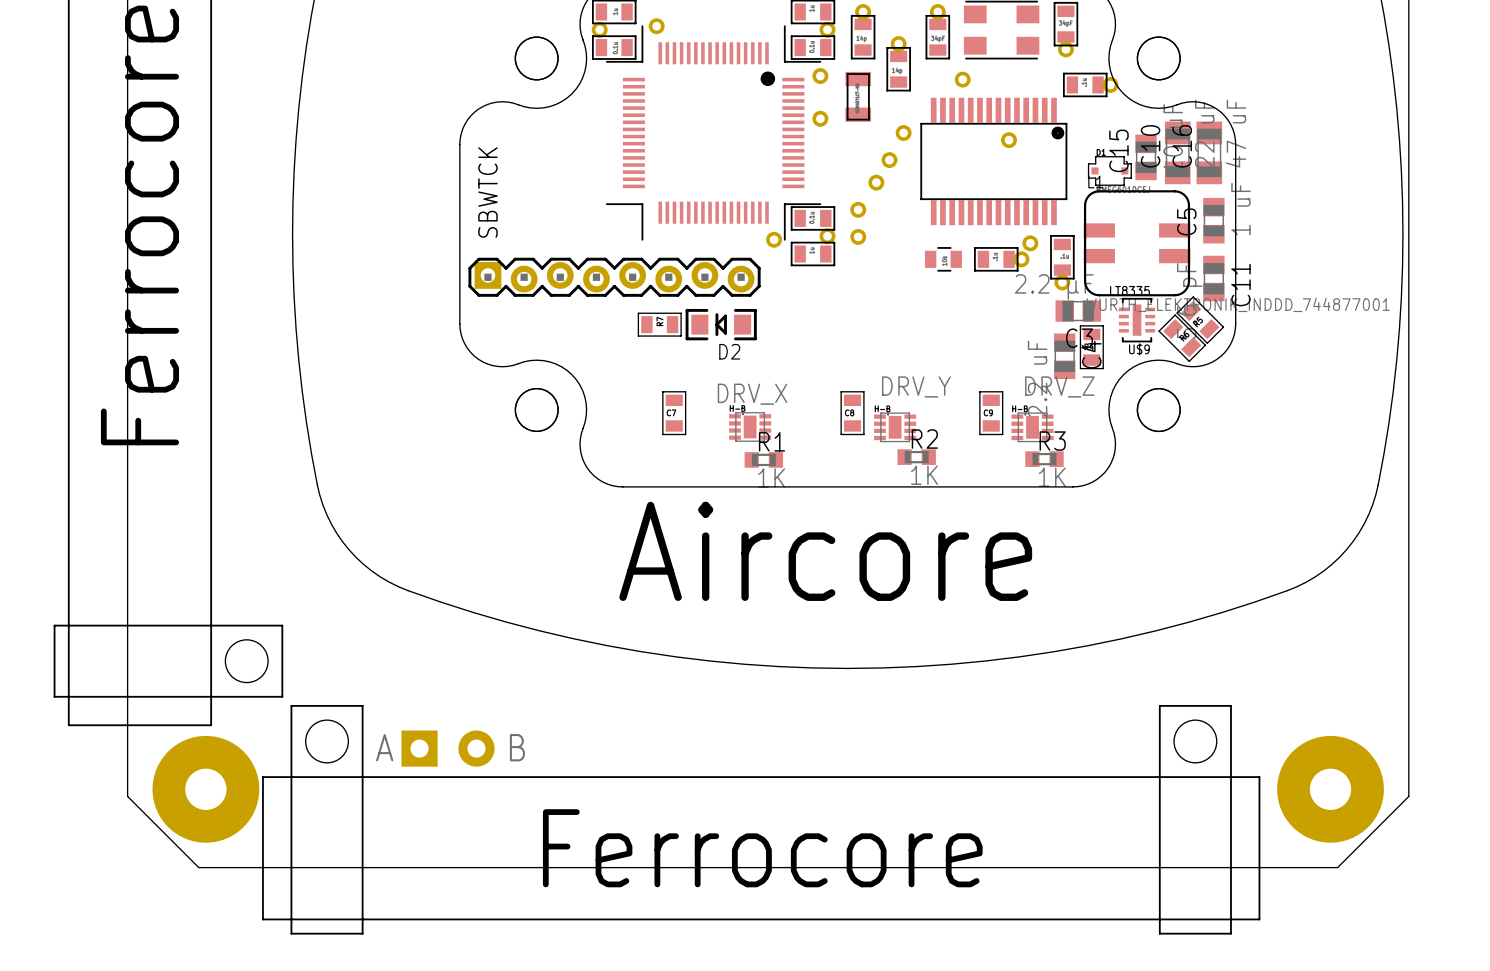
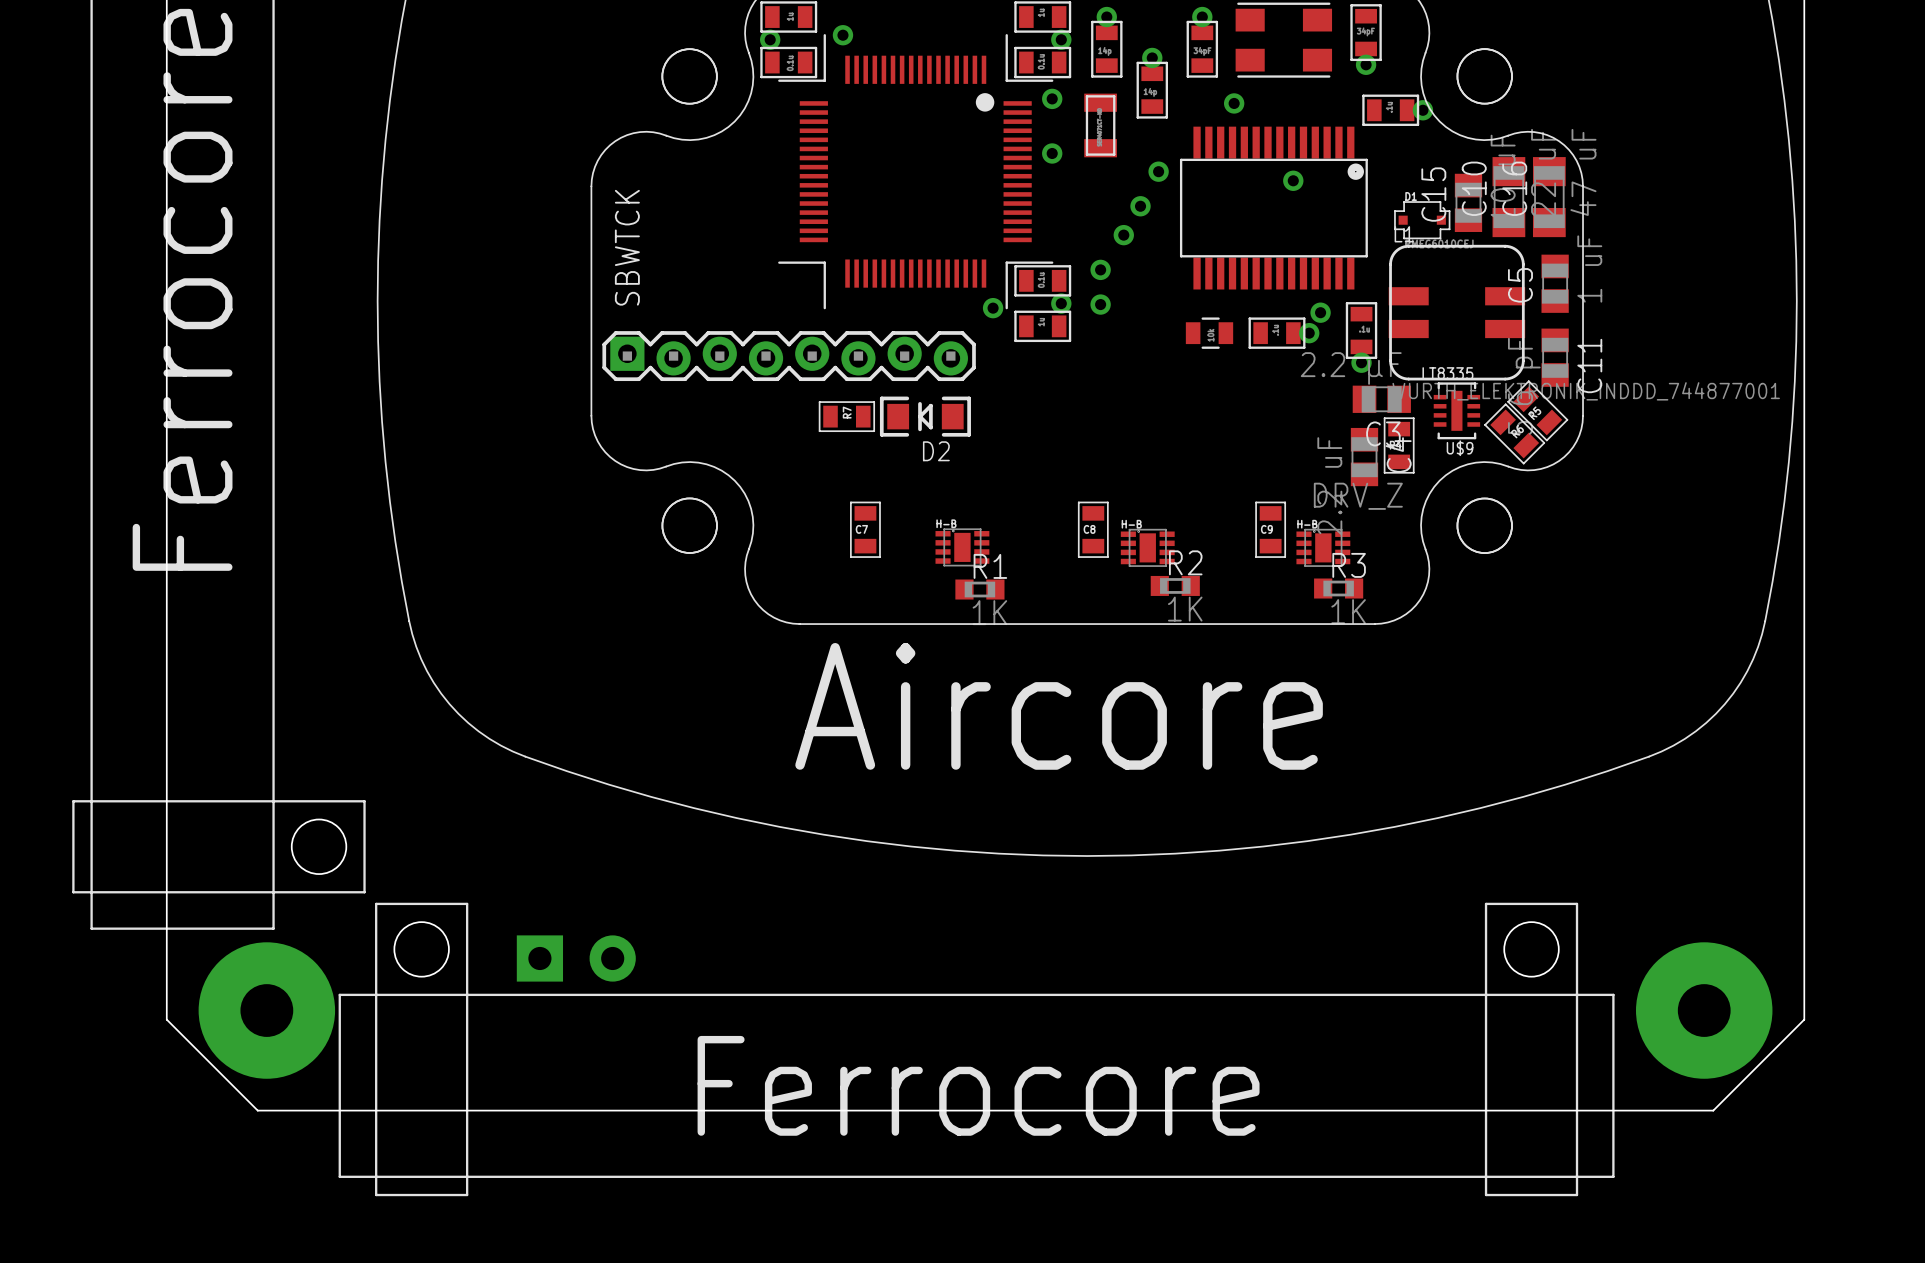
text: DRV_Y (916, 386) -> none
text: DRV_X (752, 394) -> none
text: A (384, 747) -> none
text: B (517, 747) -> none

